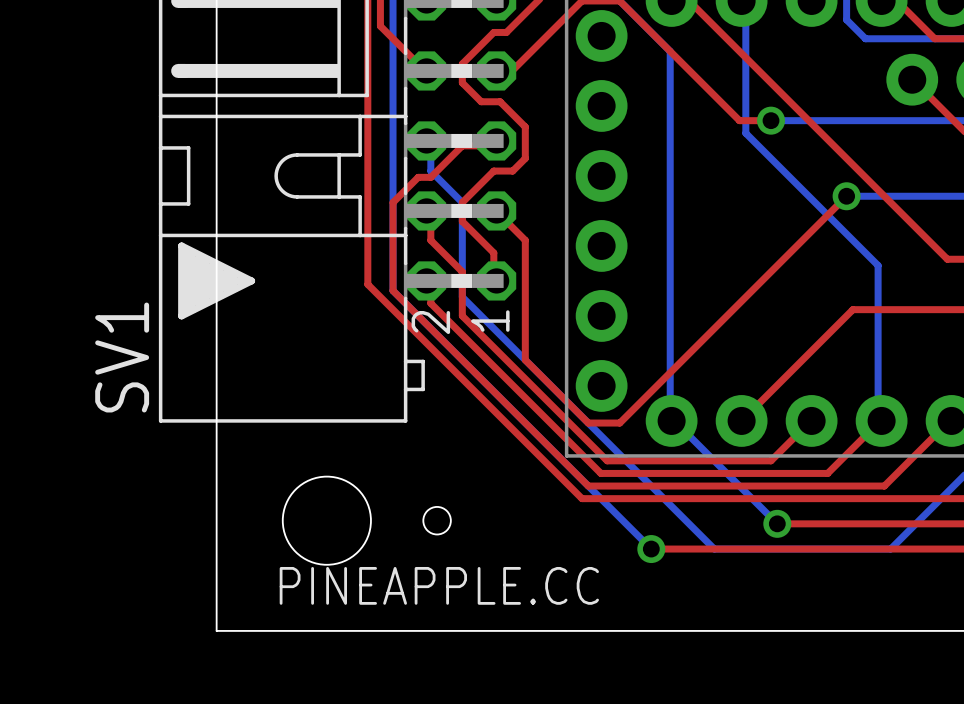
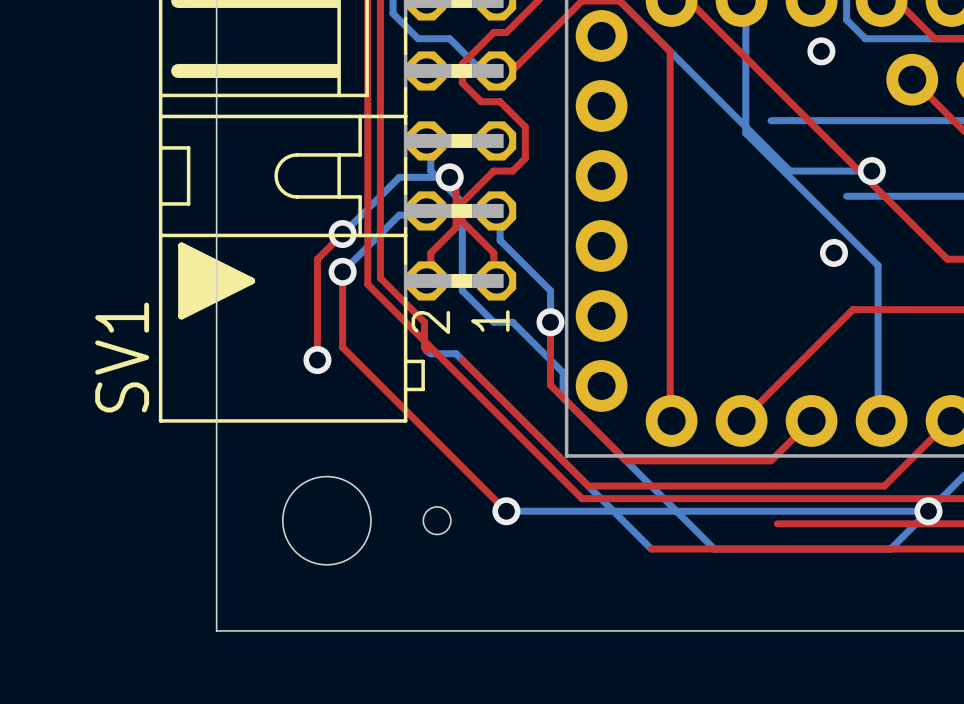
bottom track: (393, 13) (393, 290) (456, 353) -> (393, 13) (418, 38) (449, 38) (481, 70) (496, 70)
top track: (380, 26) (426, 70) -> none
bottom track: (670, 51) (670, 416) (671, 420) (676, 423) (777, 523) -> (670, 51) (789, 171) (871, 171)
top track: (670, 51) (739, 120) (771, 120) -> (670, 51) (671, 420)
via: none -> (821, 51)
via: (771, 120) -> none
top track: (496, 140) (493, 145) (462, 145) (430, 177) (418, 177) (393, 202) (393, 290) -> (380, 26) (380, 278) (393, 290)
via: none -> (871, 171)
bottom track: none -> (449, 177) (399, 177) (342, 234)
via: none -> (449, 177)
top track: (846, 196) (619, 423) (588, 423) -> none
via: (846, 196) -> none
bottom track: none -> (426, 210) (424, 215) (399, 215) (342, 271)
top track: (426, 210) (430, 215) (430, 240) (462, 271) (462, 315) (607, 460) (626, 460) -> (588, 423) (626, 460)
bottom track: none -> (496, 210) (500, 215) (500, 240) (550, 290) (550, 322)
top track: (496, 210) (525, 240) (525, 360) (550, 385) -> (550, 322) (550, 385)
top track: none -> (342, 234) (317, 259) (317, 360)
via: none -> (342, 234)
via: none -> (834, 252)
top track: none -> (342, 271) (342, 347) (506, 511)
via: none -> (342, 271)
top track: (426, 280) (430, 284) (430, 303) (600, 473) (827, 473) (881, 420) -> (426, 280) (430, 278) (430, 252) (456, 227) (456, 183) (449, 177)
bottom track: (462, 290) (462, 297) (563, 397) -> (462, 290) (493, 322) (512, 322) (563, 372) (563, 397)
top track: (424, 322) (462, 360) -> (424, 322) (424, 347) (426, 350)
via: none -> (550, 322)
bottom track: none -> (426, 350) (430, 353) (456, 353)
via: none -> (317, 360)
bottom track: none -> (506, 511) (928, 511)
via: none -> (506, 511)
via: none -> (928, 511)
via: (777, 523) -> none
via: (651, 549) -> none
text: PINEAPPLE.CC (439, 585) -> none

